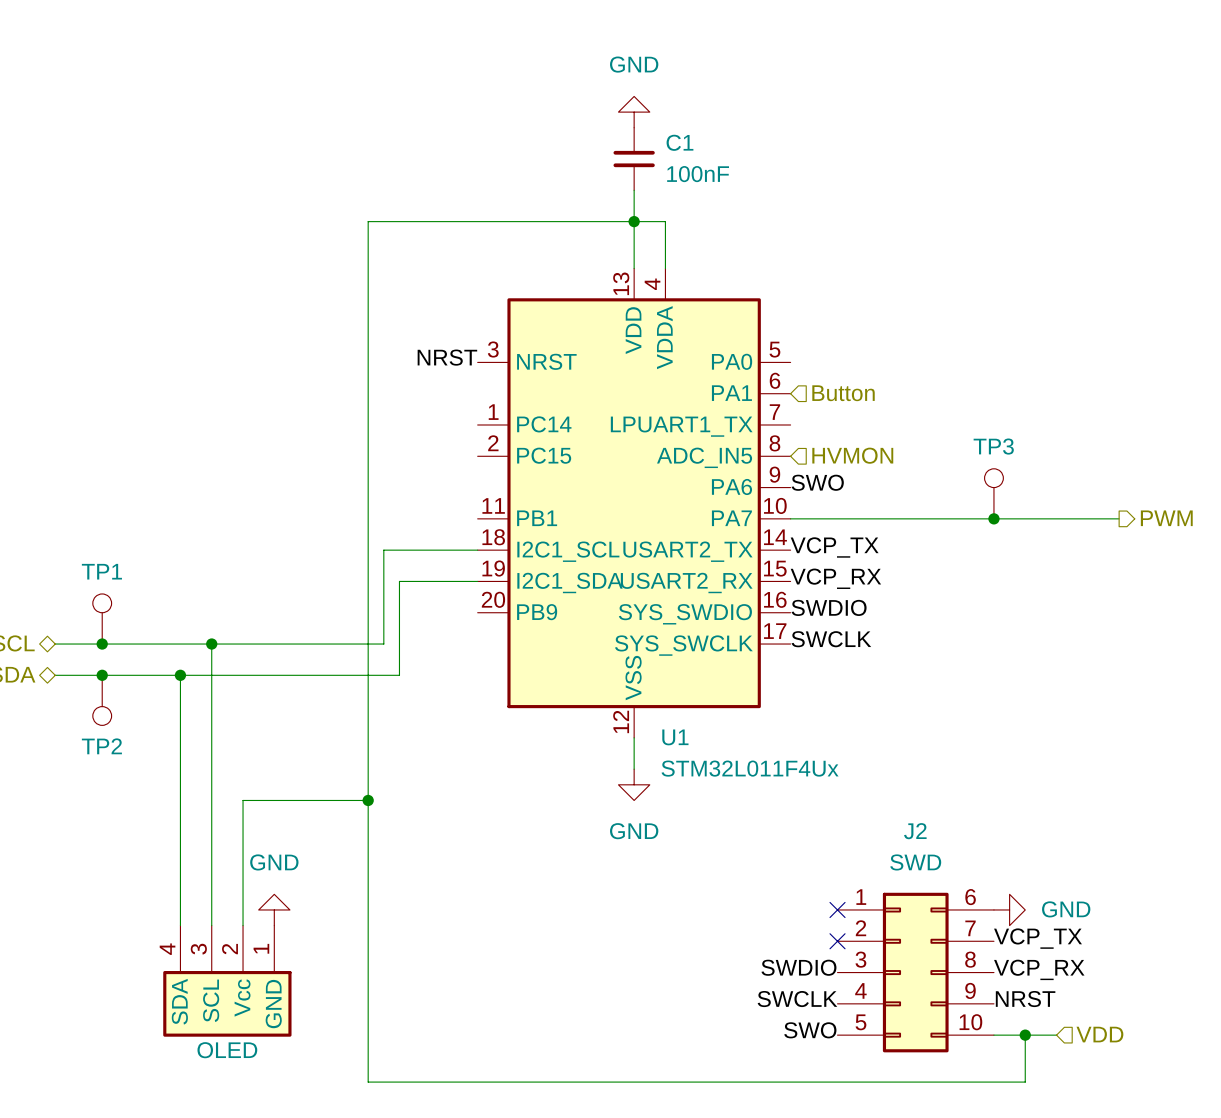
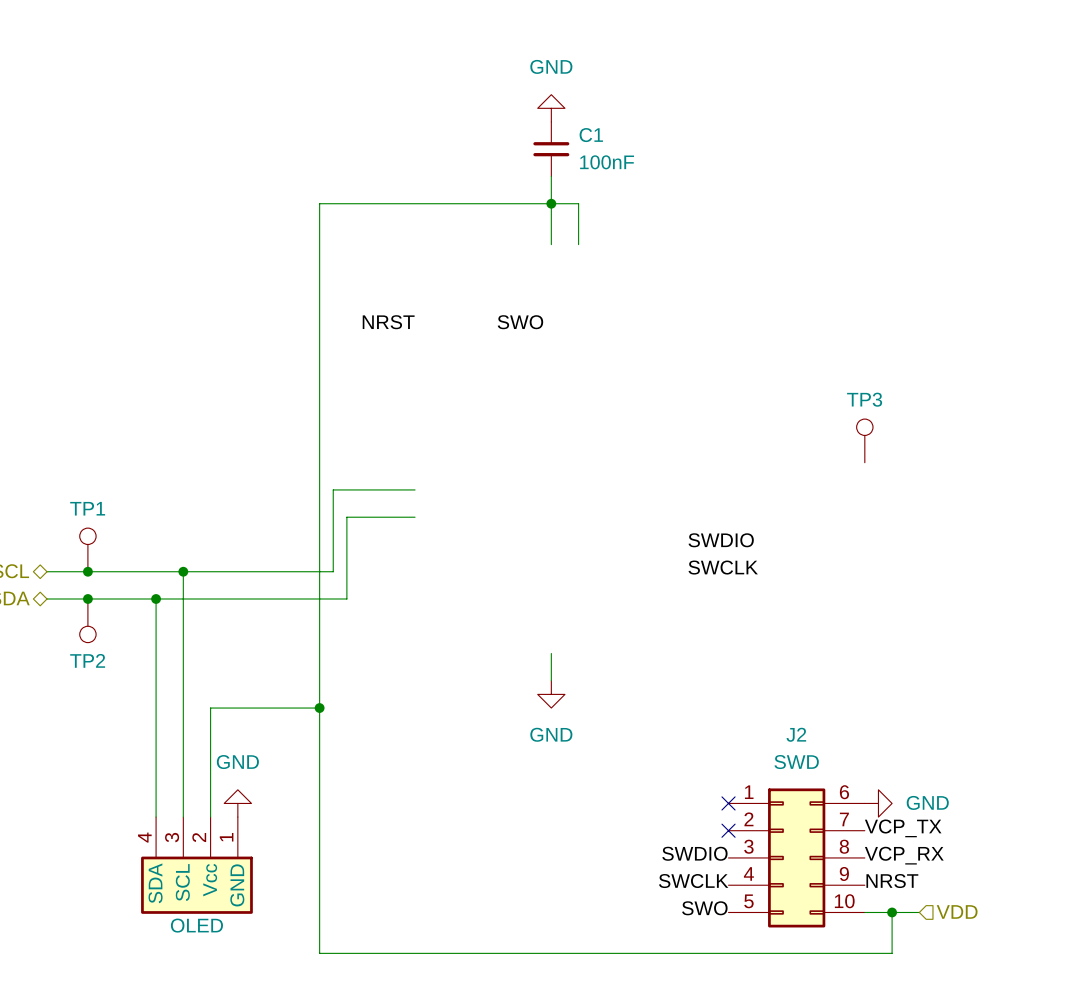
hierarchical label: Button (843, 393) -> none
hierarchical label: HVMON (852, 455) -> none
label position: SWO (817, 482) -> SWO (520, 322)
U1: STM32L011F4Ux (634, 503) -> none
wire: (790, 518) (1119, 518) -> none
junction: (993, 518) -> none
hierarchical label: PWM (1166, 518) -> none
label: VCP_TX (834, 547) -> none
label: VCP_RX (835, 578) -> none

